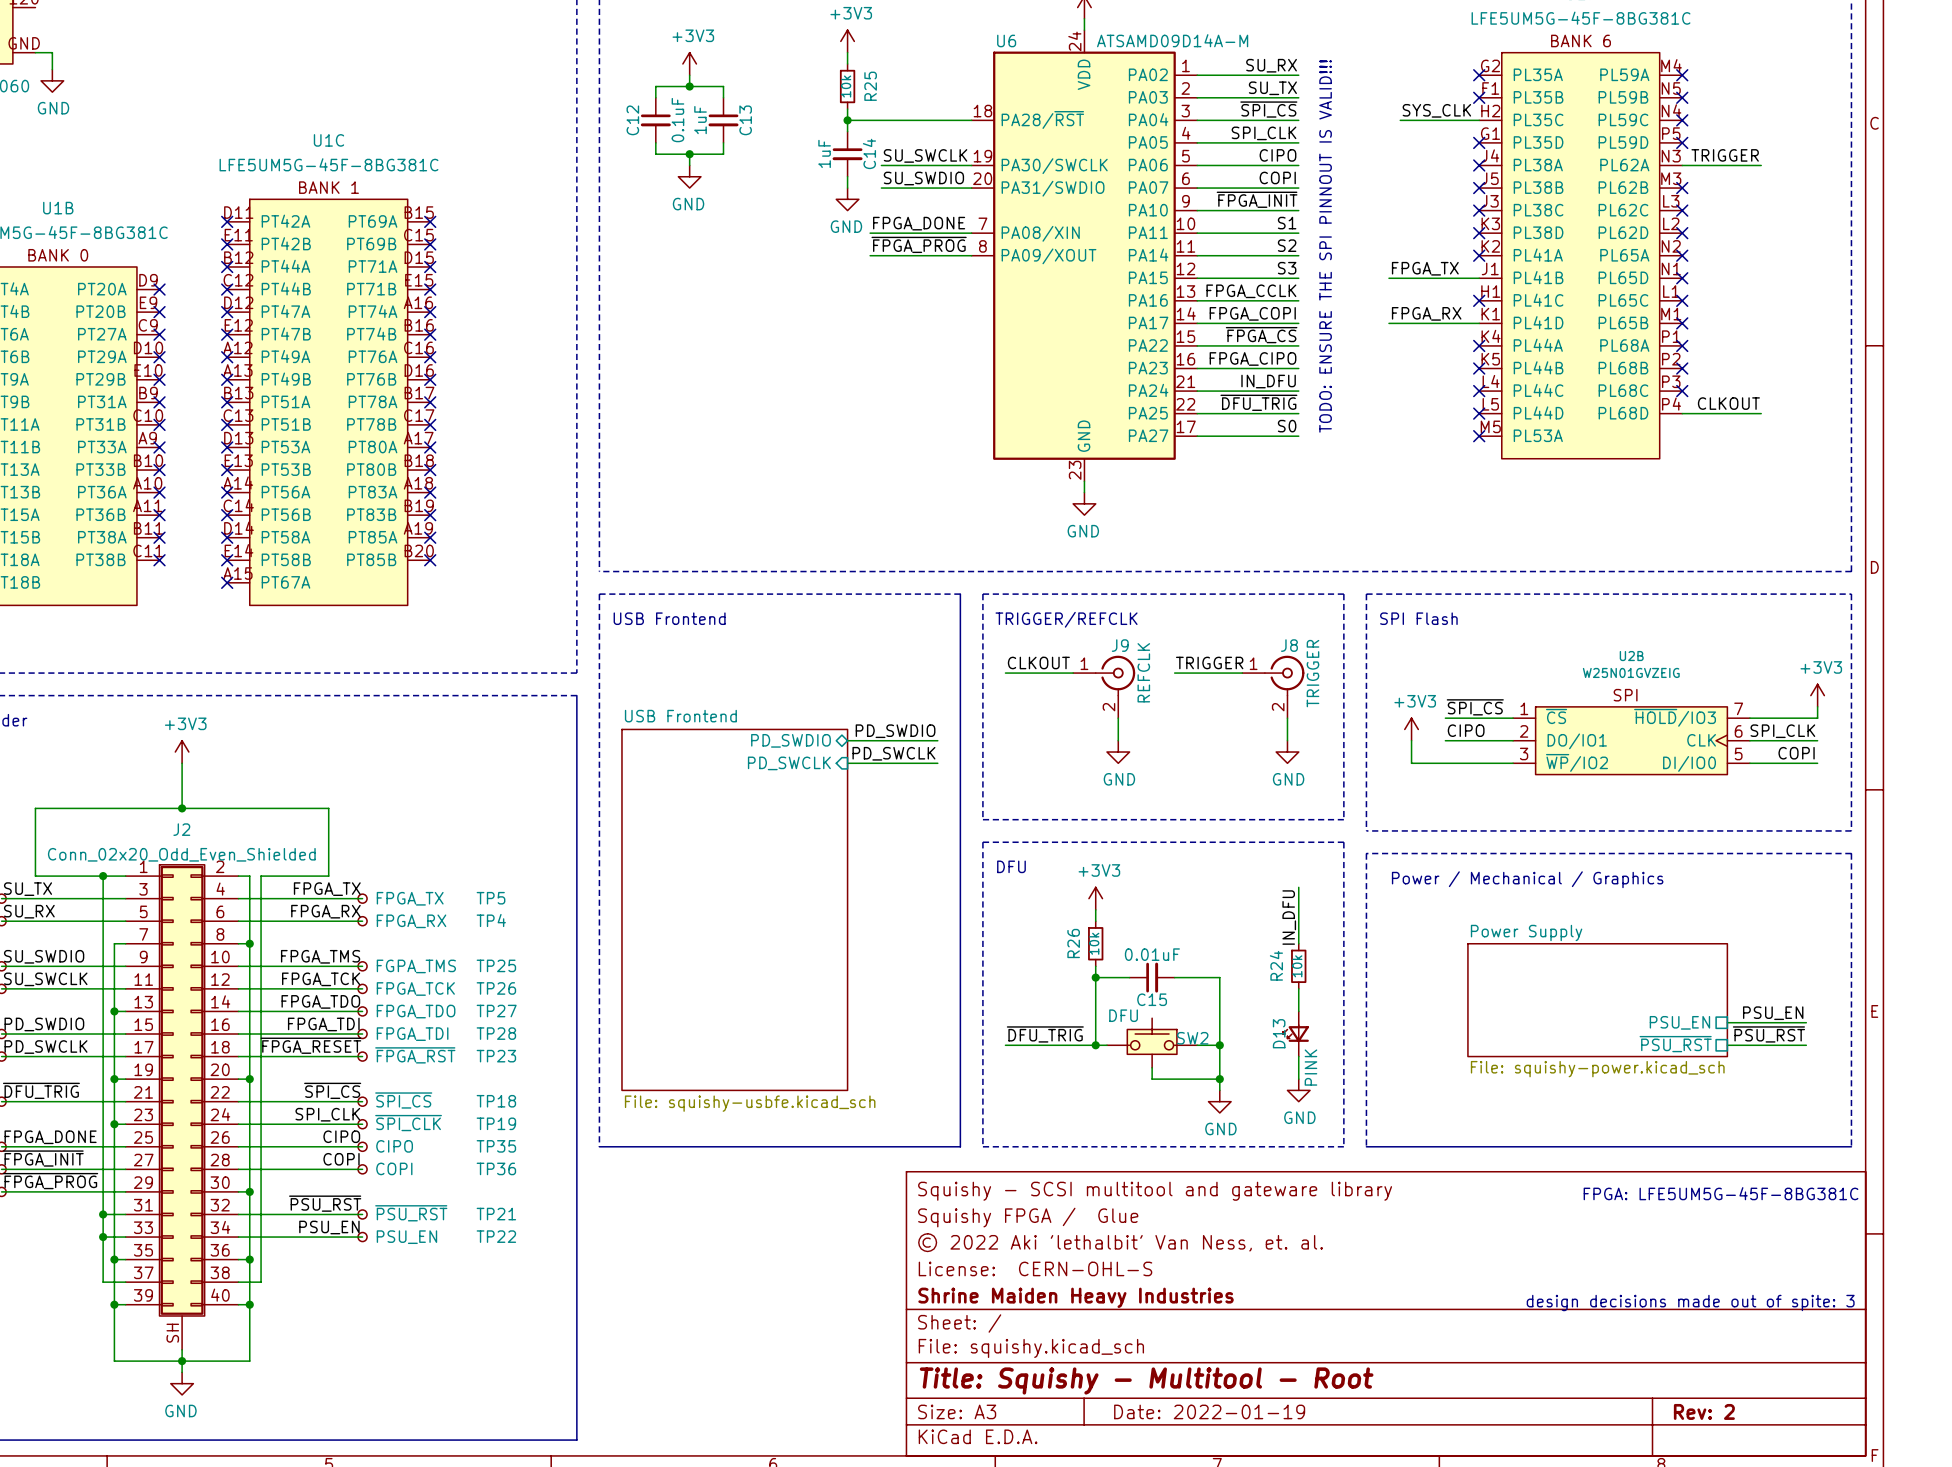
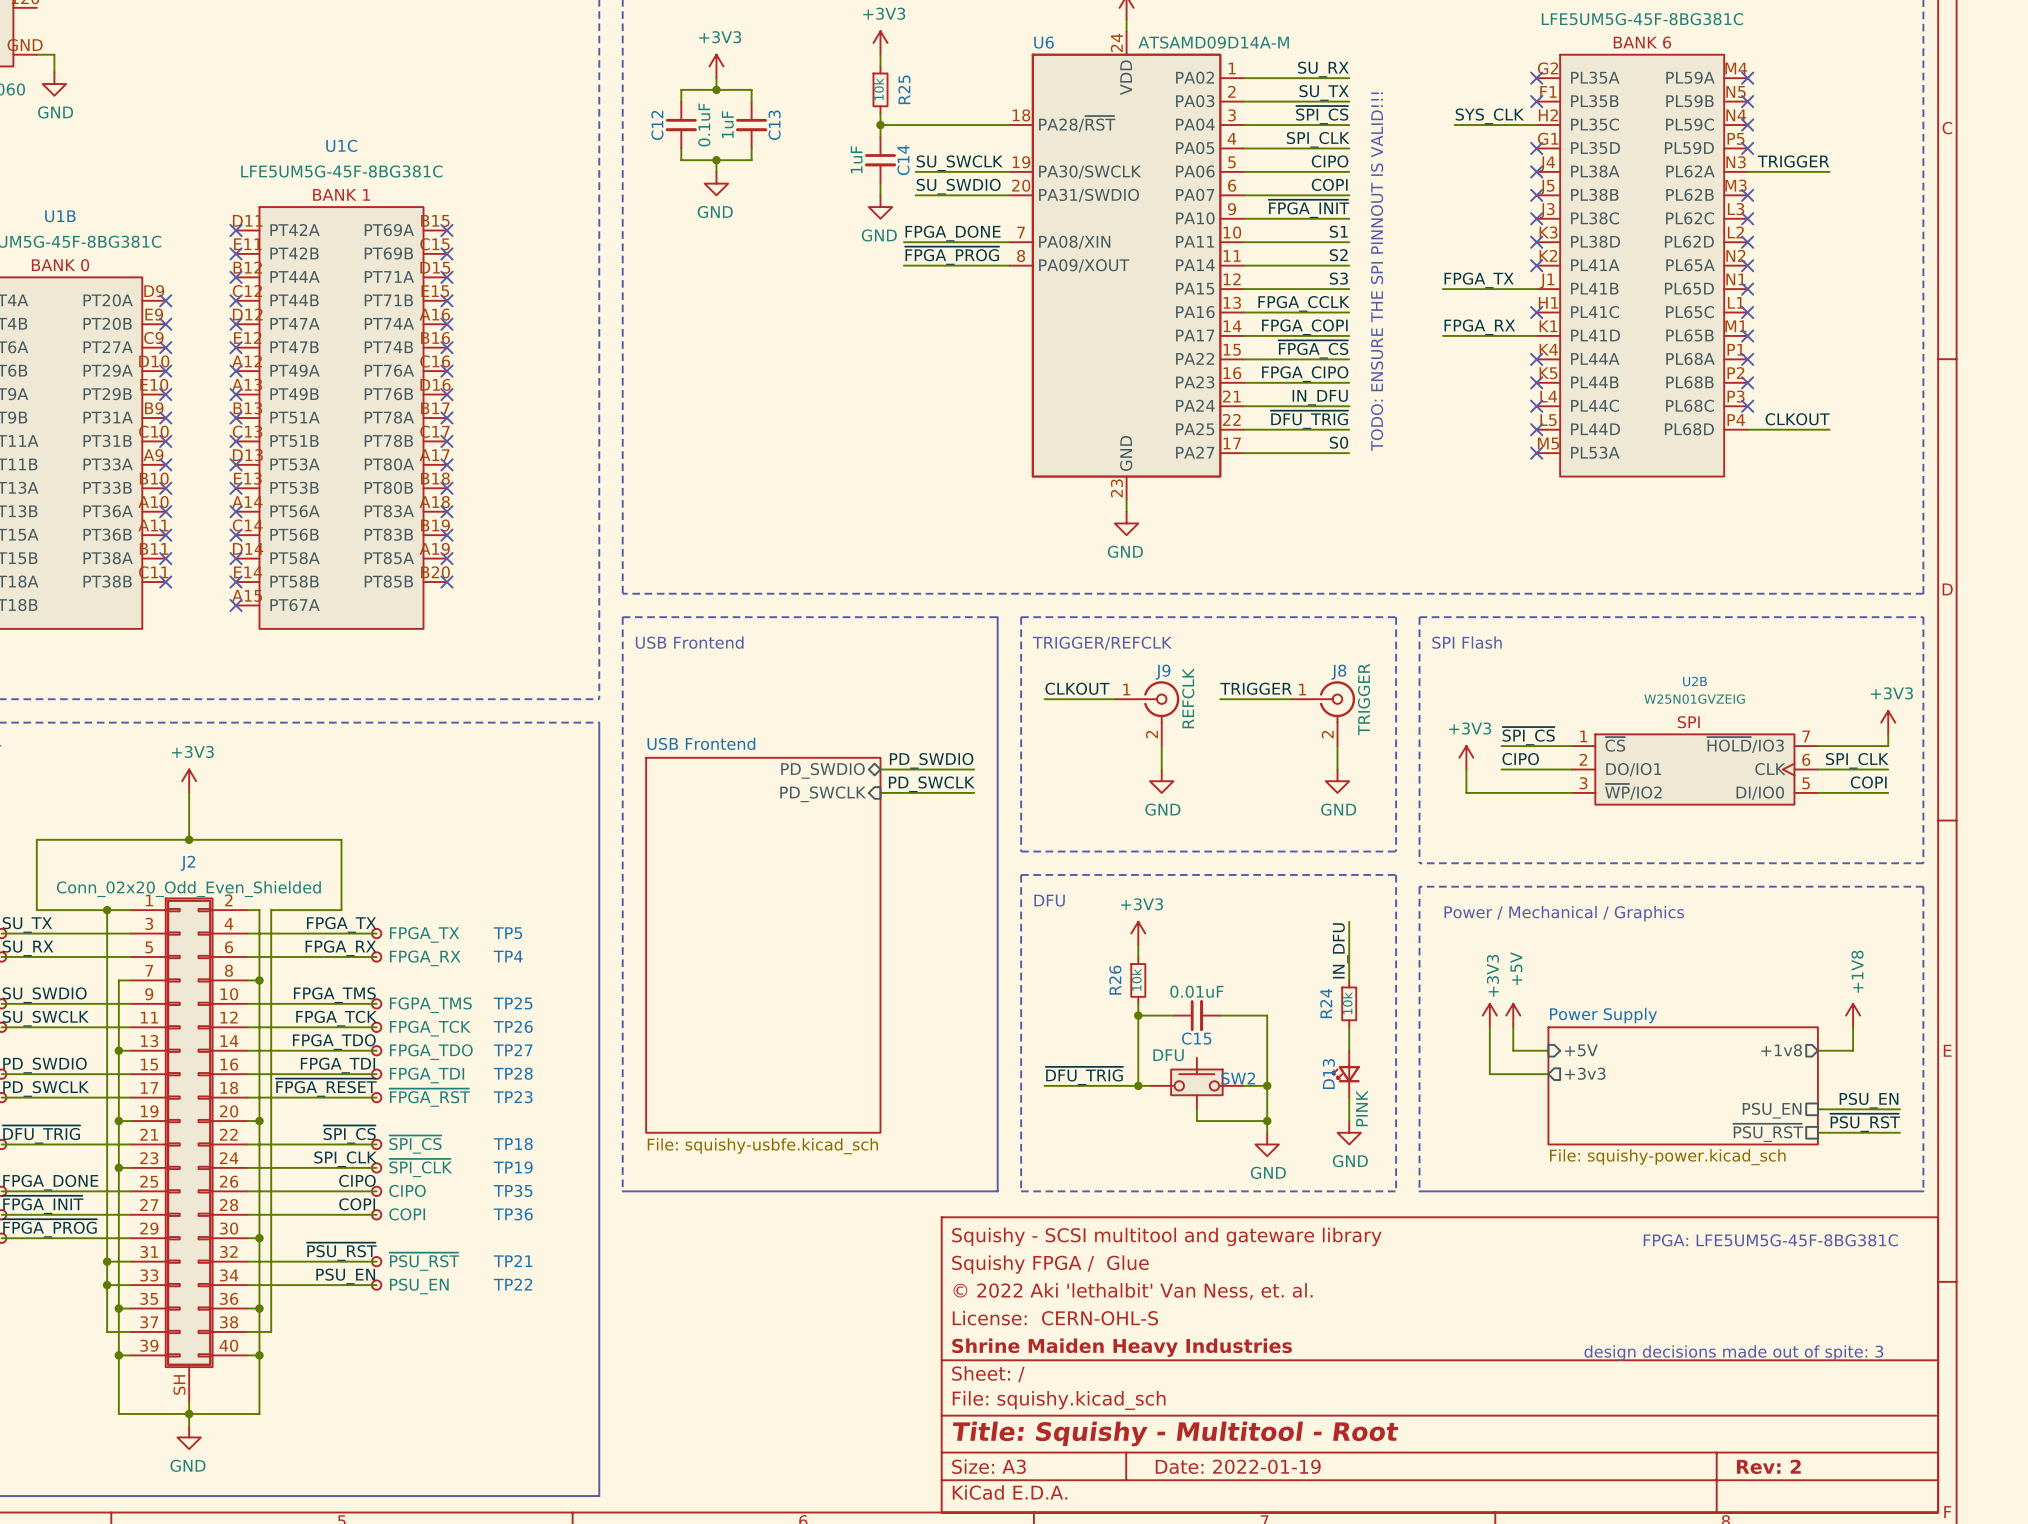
power symbol: none -> +3V3 (1489, 1015)
power symbol: none -> +5V (1513, 1015)
power symbol: none -> +1V8 (1853, 1015)
wire: none -> (1489, 1027) (1489, 1074) (1548, 1074)
wire: none -> (1513, 1027) (1513, 1050) (1548, 1050)
wire: none -> (1853, 1027) (1853, 1050) (1817, 1050)
sheet Power Supply position: (1597, 1000) -> (1683, 1085)
sheet pin: none -> +5V (1581, 1050)
sheet pin: none -> +1v8 (1781, 1050)
label position: PSU_EN (1773, 1013) -> PSU_EN (1869, 1100)
sheet pin position: PSU_EN (1679, 1022) -> PSU_EN (1772, 1110)
wire: (1727, 1022) (1806, 1022) -> (1817, 1109) (1899, 1109)
sheet pin: none -> +3v3 (1585, 1073)
label position: ~{PSU_RST} (1768, 1034) -> ~{PSU_RST} (1865, 1122)
sheet pin position: ~{PSU_RST} (1675, 1044) -> ~{PSU_RST} (1768, 1132)
wire: (1727, 1045) (1806, 1045) -> (1817, 1132) (1899, 1132)

